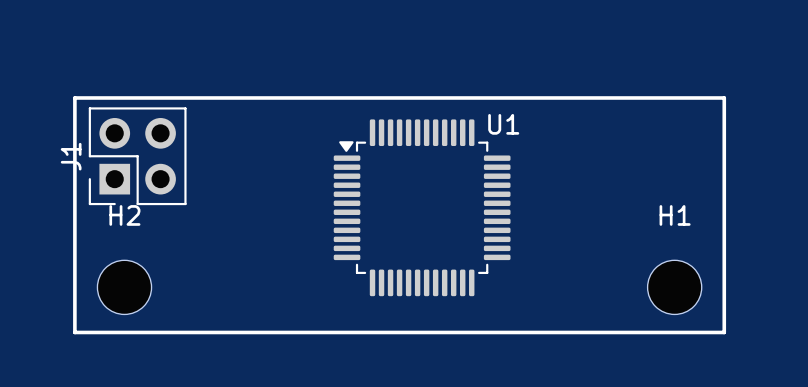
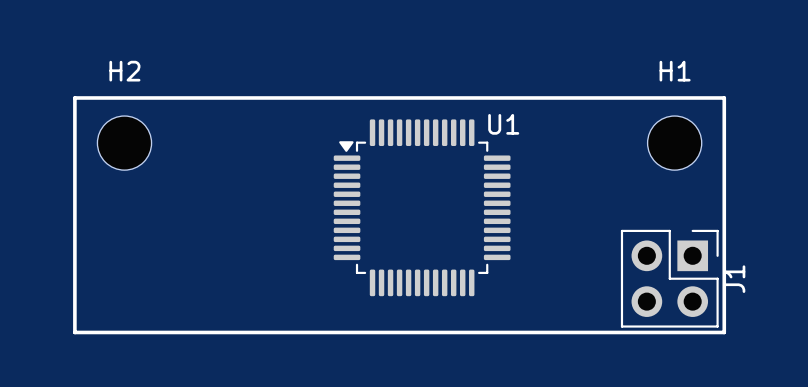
J1 rotation: 0° (137, 156) -> 180° (669, 278)
J1 position: (137, 156) -> (669, 278)
H2 position: (124, 287) -> (124, 143)
H1 position: (674, 287) -> (674, 143)

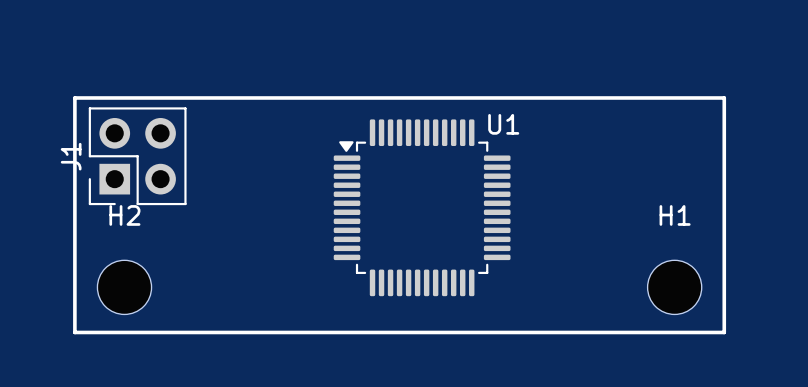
H2 position: (124, 143) -> (124, 287)
H1 position: (674, 143) -> (674, 287)
J1 rotation: 0° (669, 278) -> 180° (137, 156)
J1 position: (669, 278) -> (137, 156)

